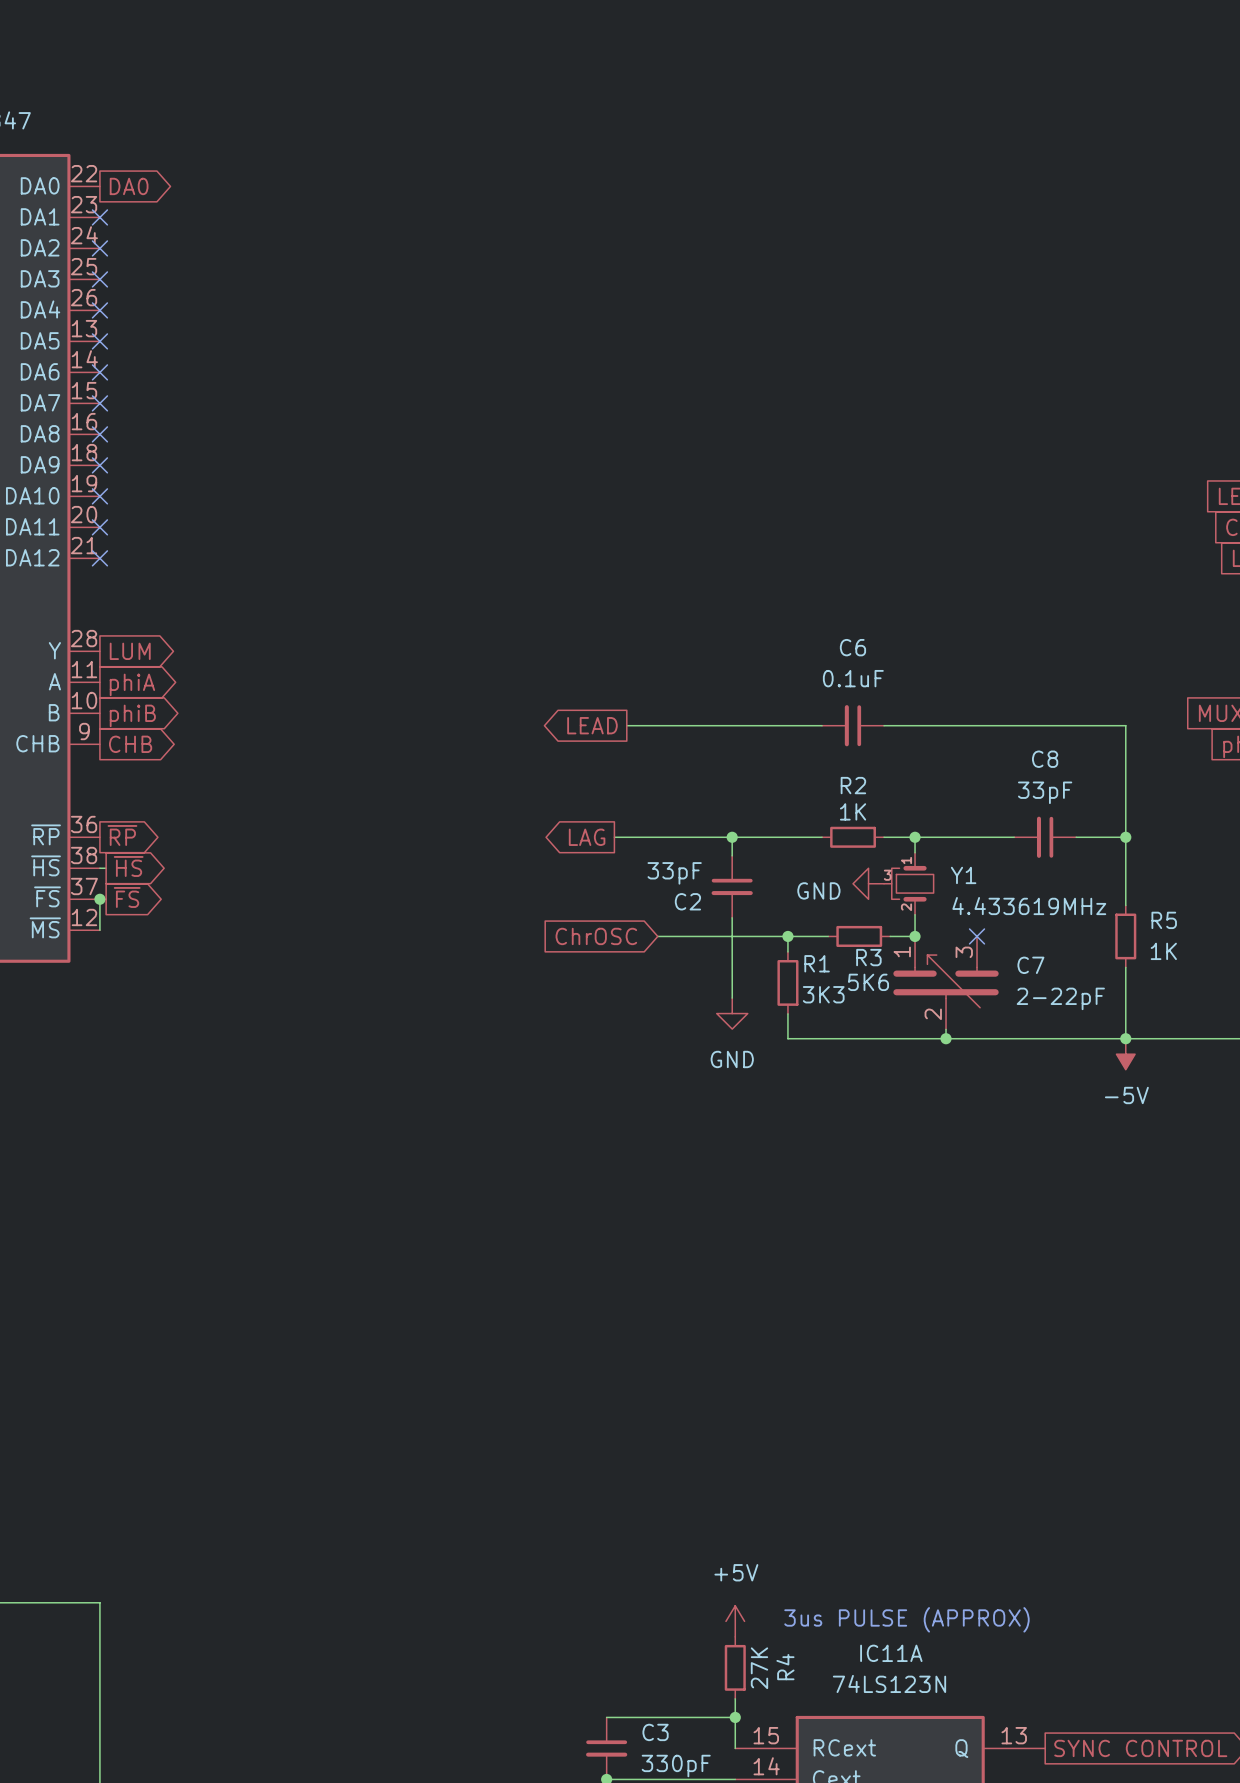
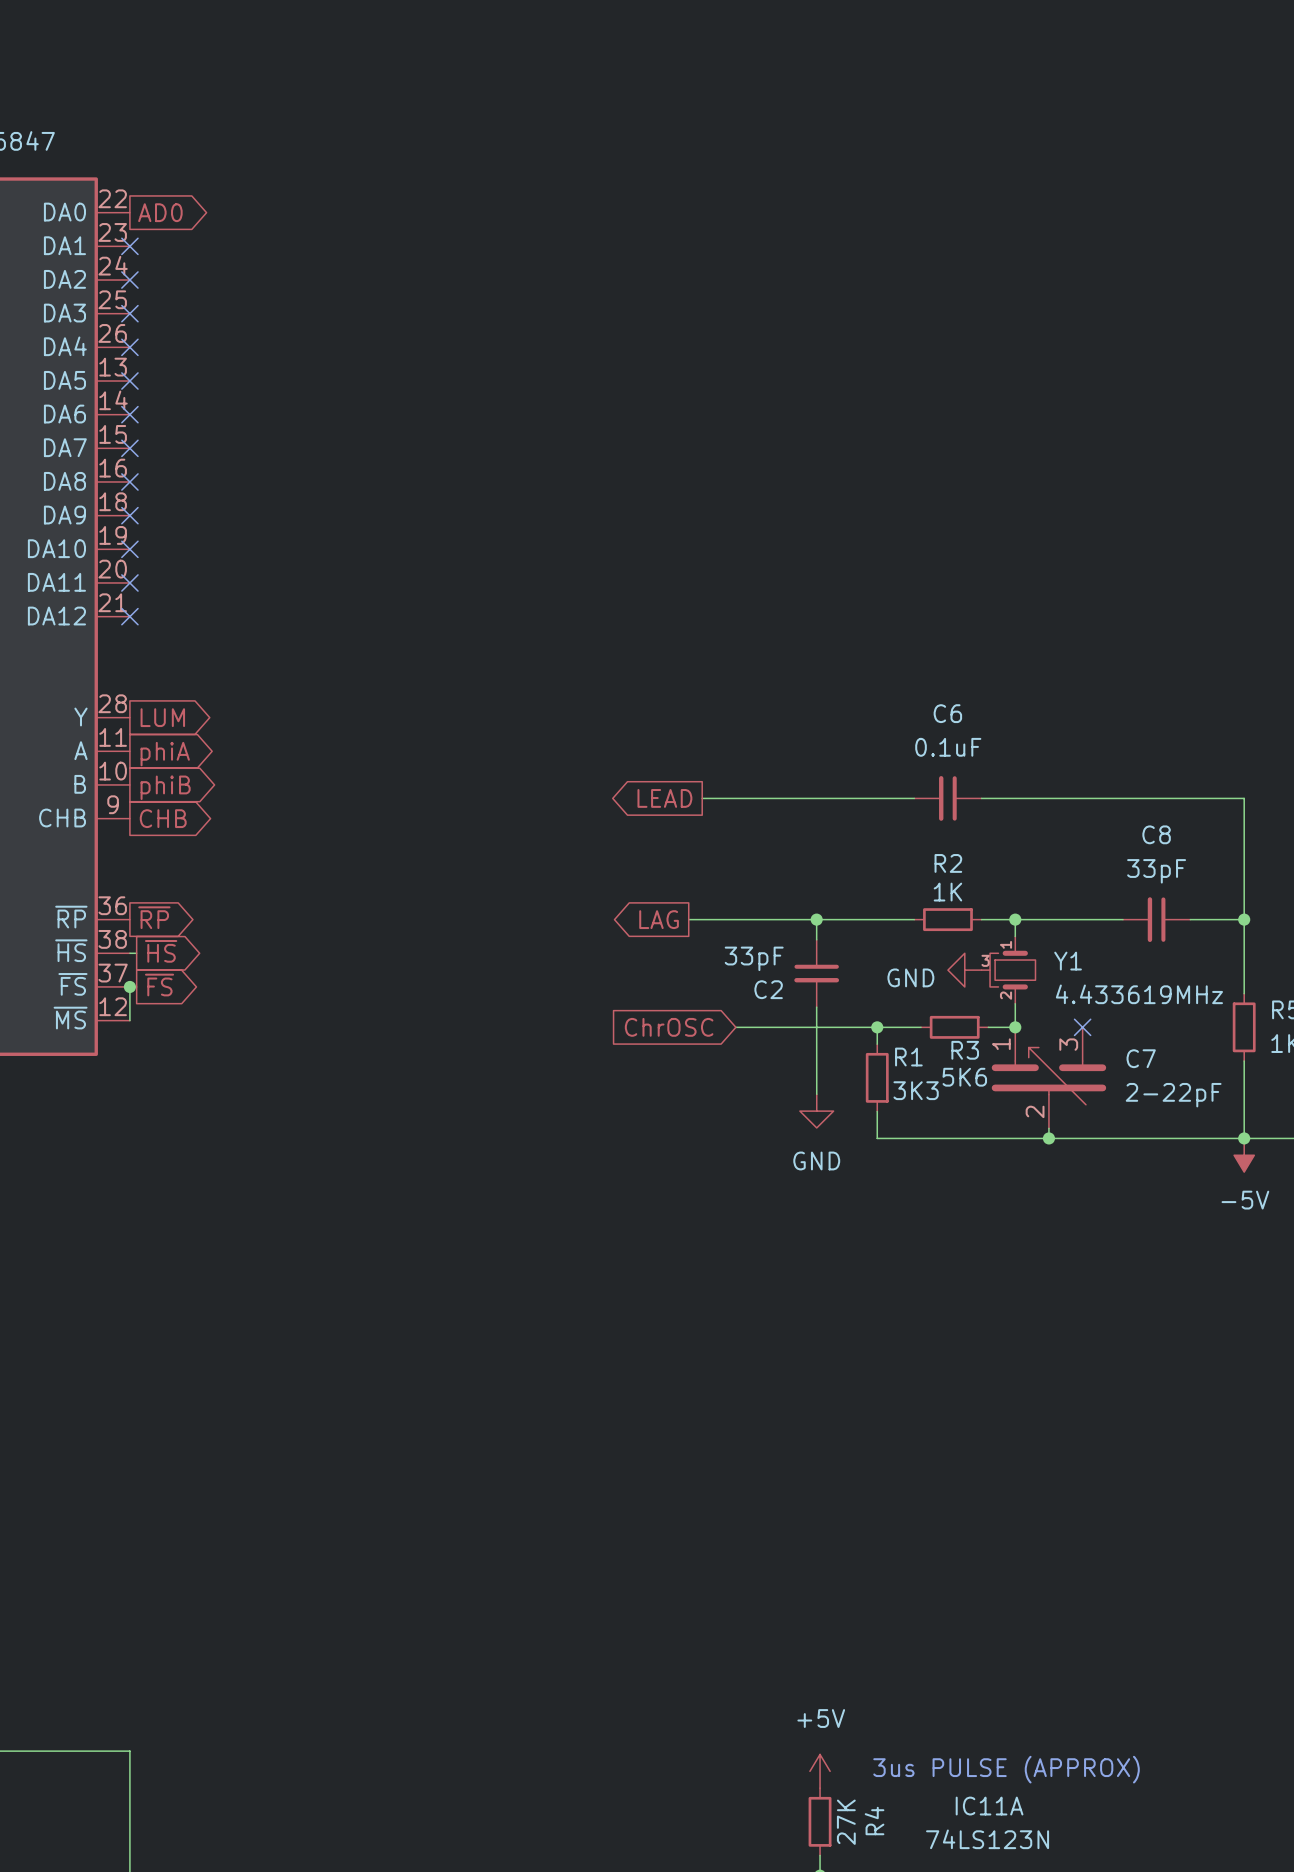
global label: DA0 (129, 186) -> AD0 (160, 212)

